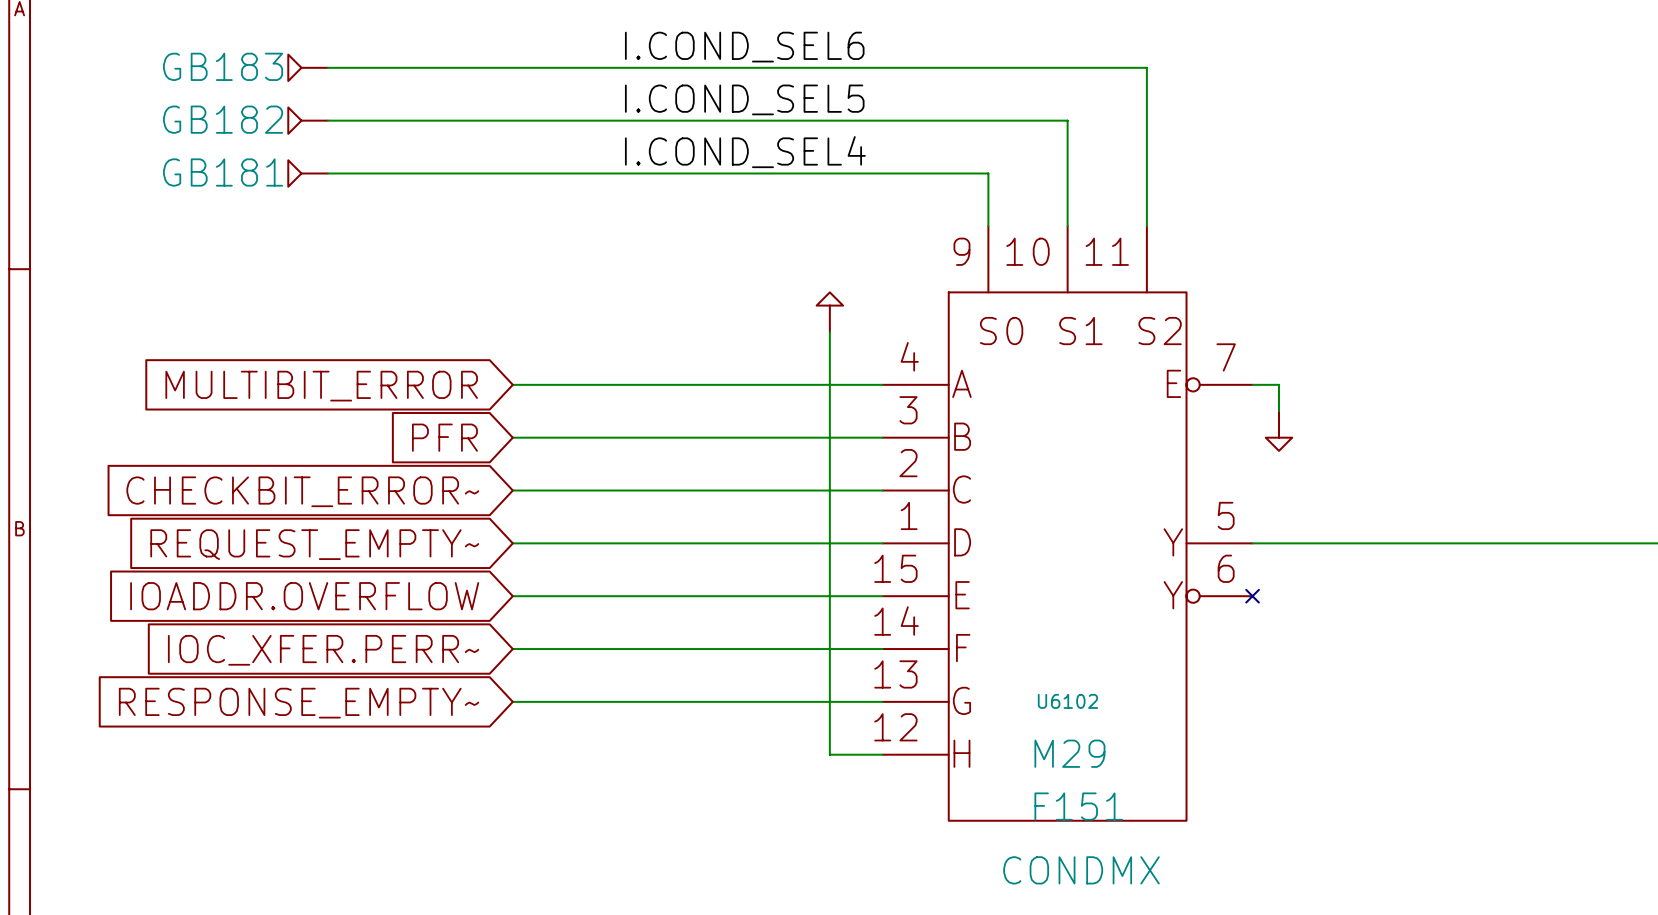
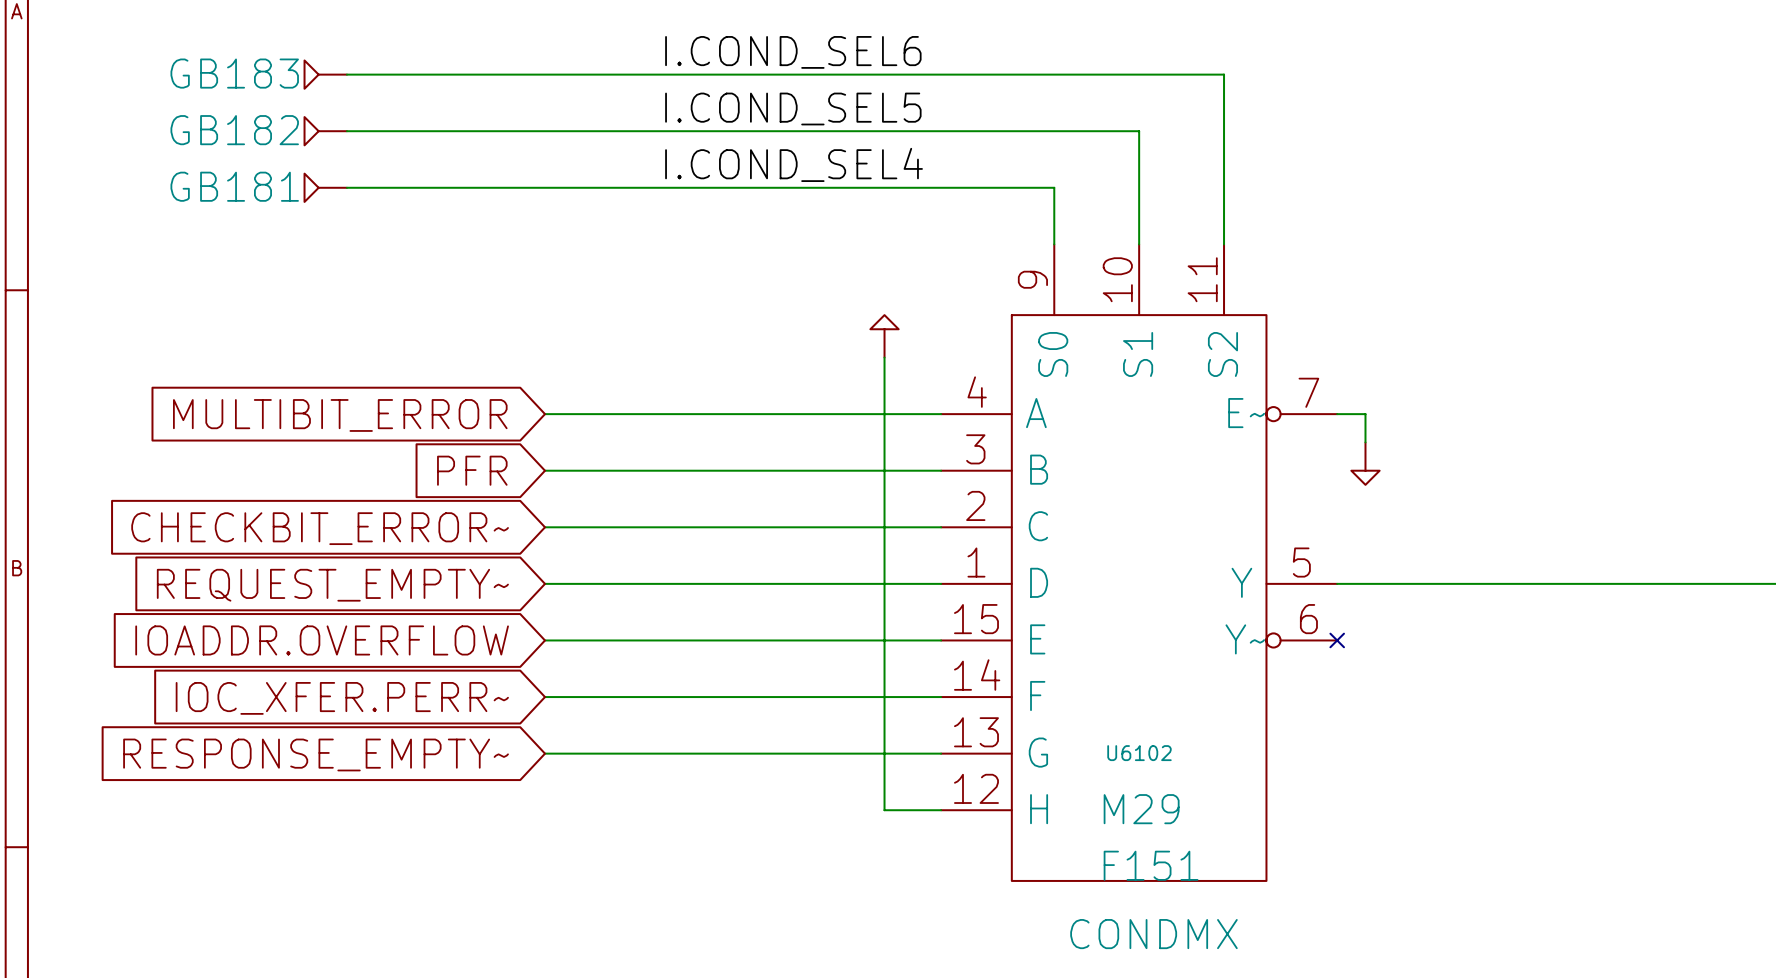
U6102 symbol: [882, 226, 1253, 821] -> [941, 244, 1338, 881]

